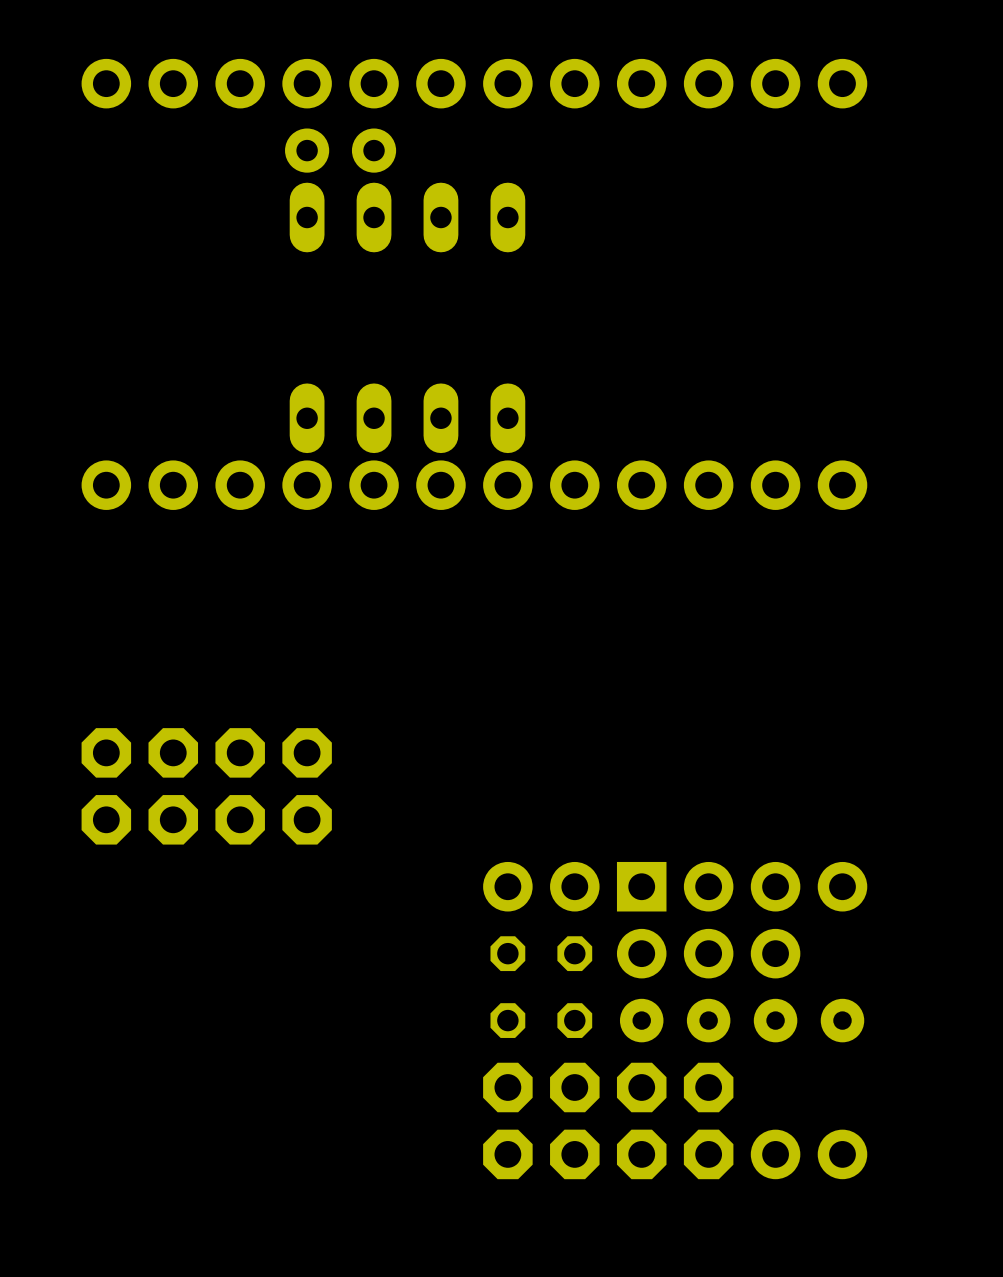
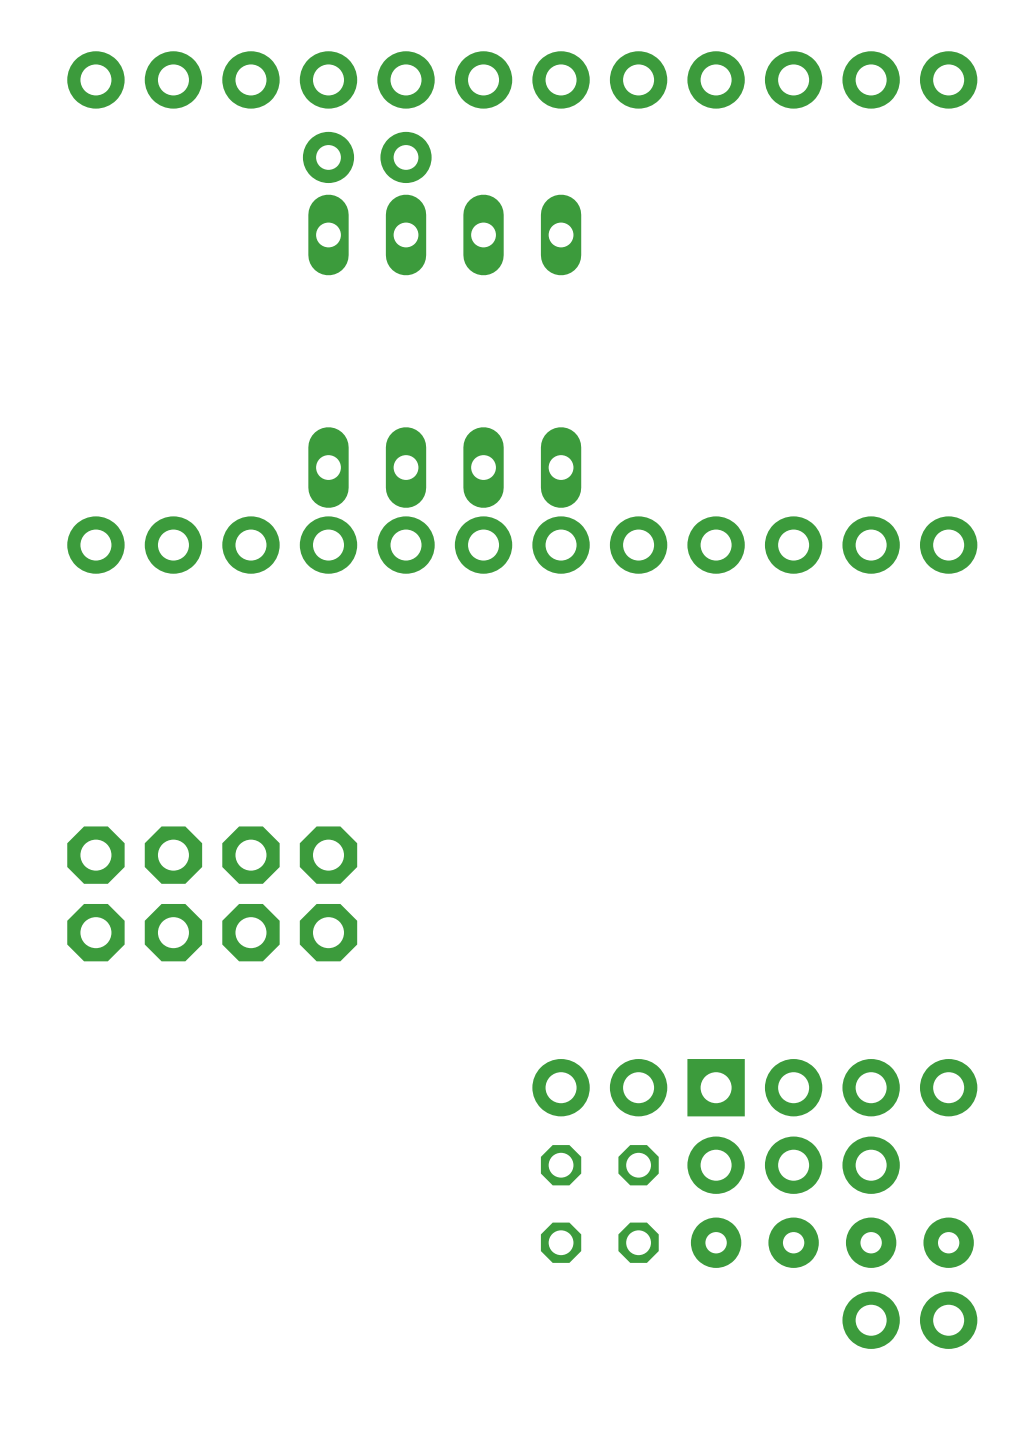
part position: (541, 886) -> (599, 1087)
part position: (742, 886) -> (832, 1087)
part position: (708, 953) -> (793, 1165)
part: (507, 987) -> none
part: (574, 987) -> none
part position: (675, 1020) -> (754, 1242)
part position: (809, 1020) -> (909, 1242)
part: none -> (561, 1203)
part: none -> (638, 1203)
part: (608, 1120) -> none

